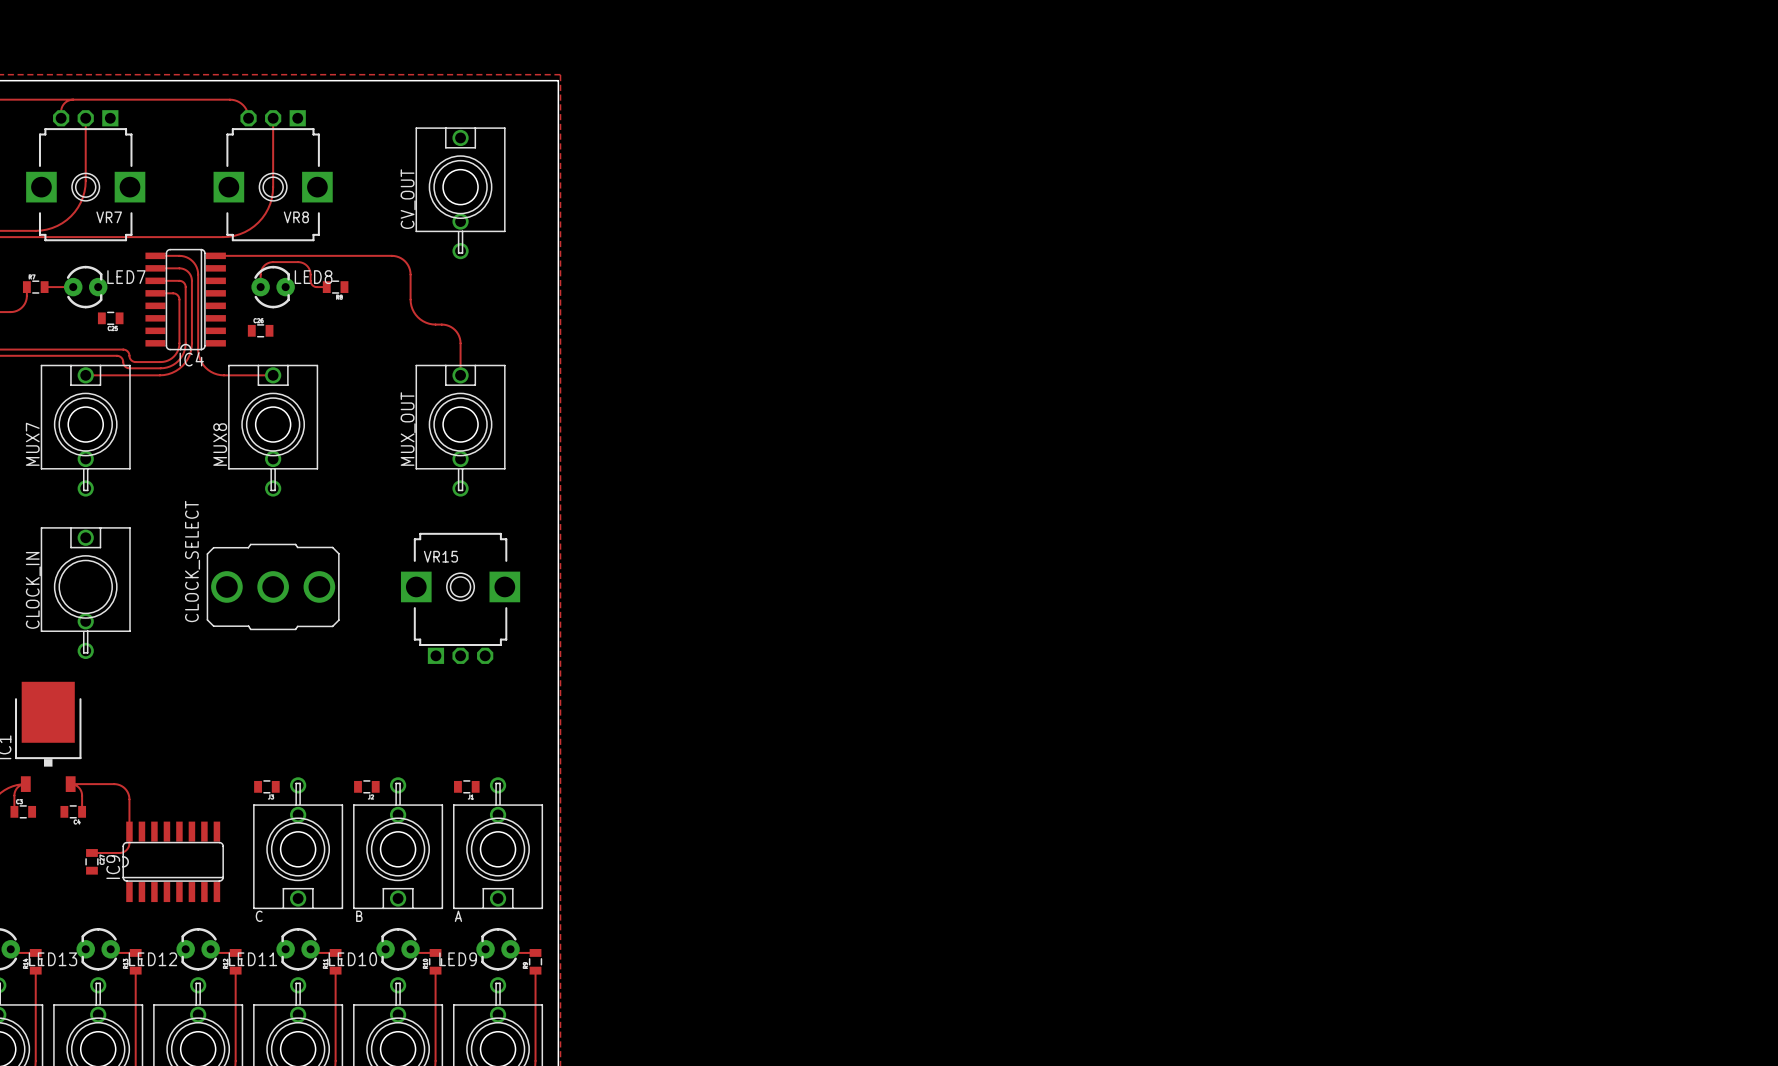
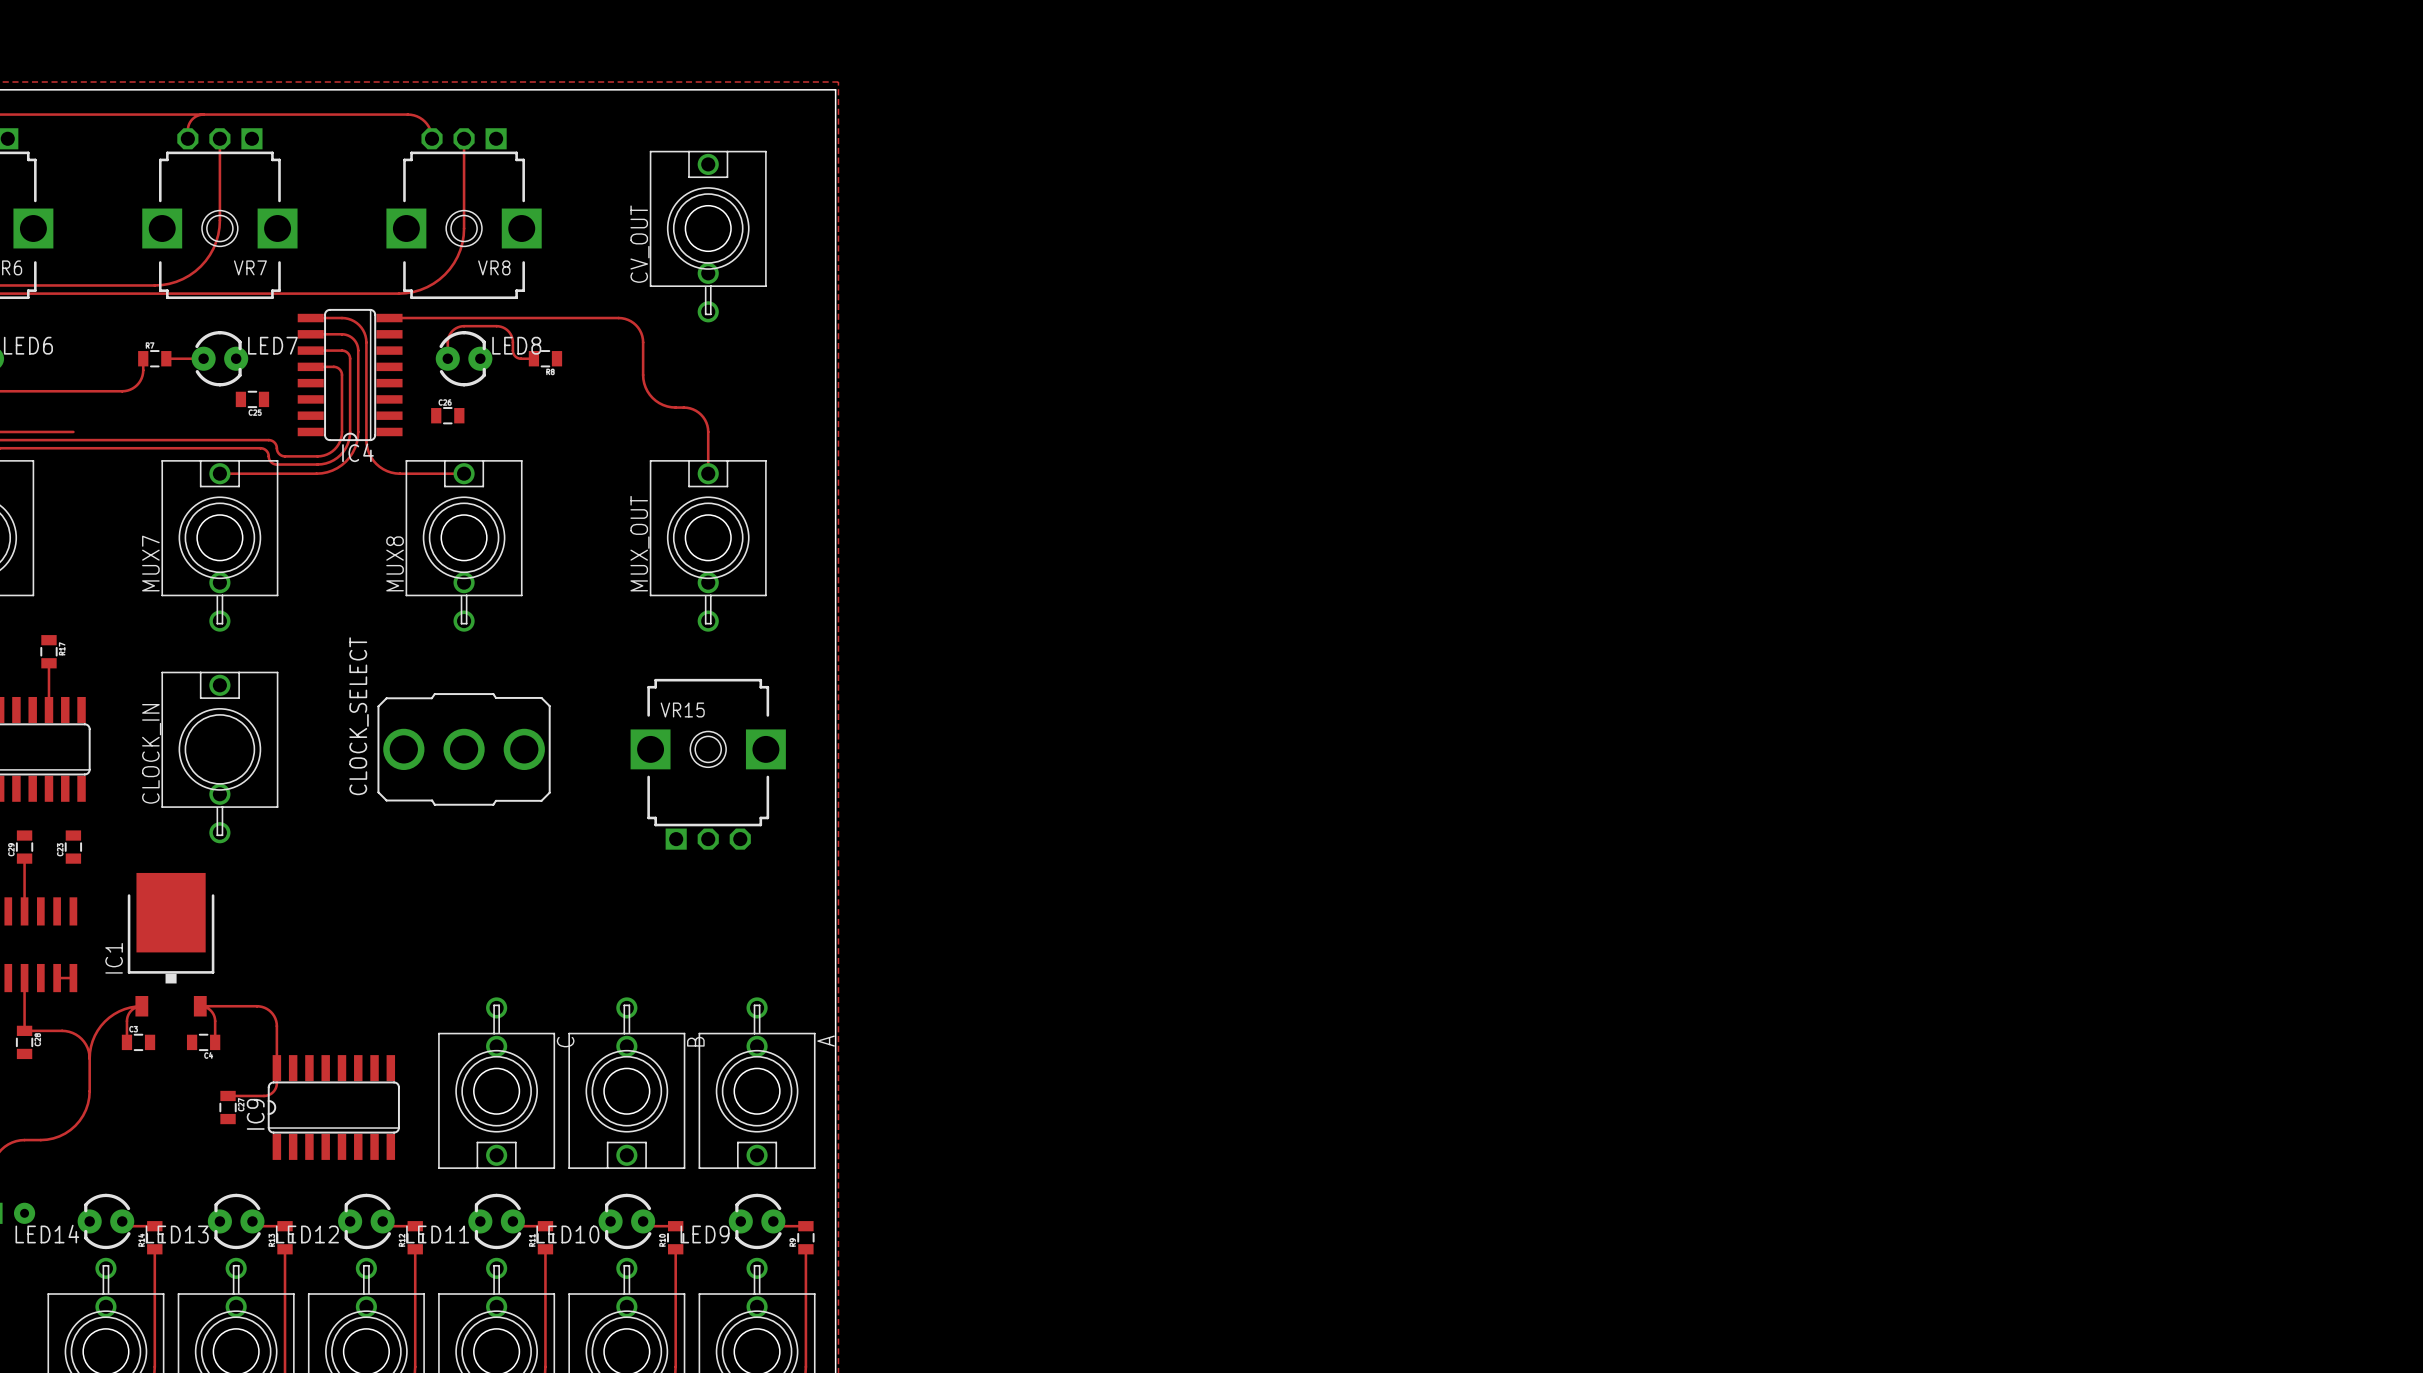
part: (266, 786) -> none
part: (366, 786) -> none
part: (466, 786) -> none
C name rotation: 0° (259, 916) -> 90° counterclockwise (565, 1042)
C name position: C (259, 916) -> C (565, 1042)
B name rotation: 0° (359, 916) -> 90° counterclockwise (695, 1041)
B name position: B (359, 916) -> B (695, 1041)
A name rotation: 0° (458, 916) -> 90° counterclockwise (826, 1041)
A name position: A (458, 916) -> A (826, 1041)

